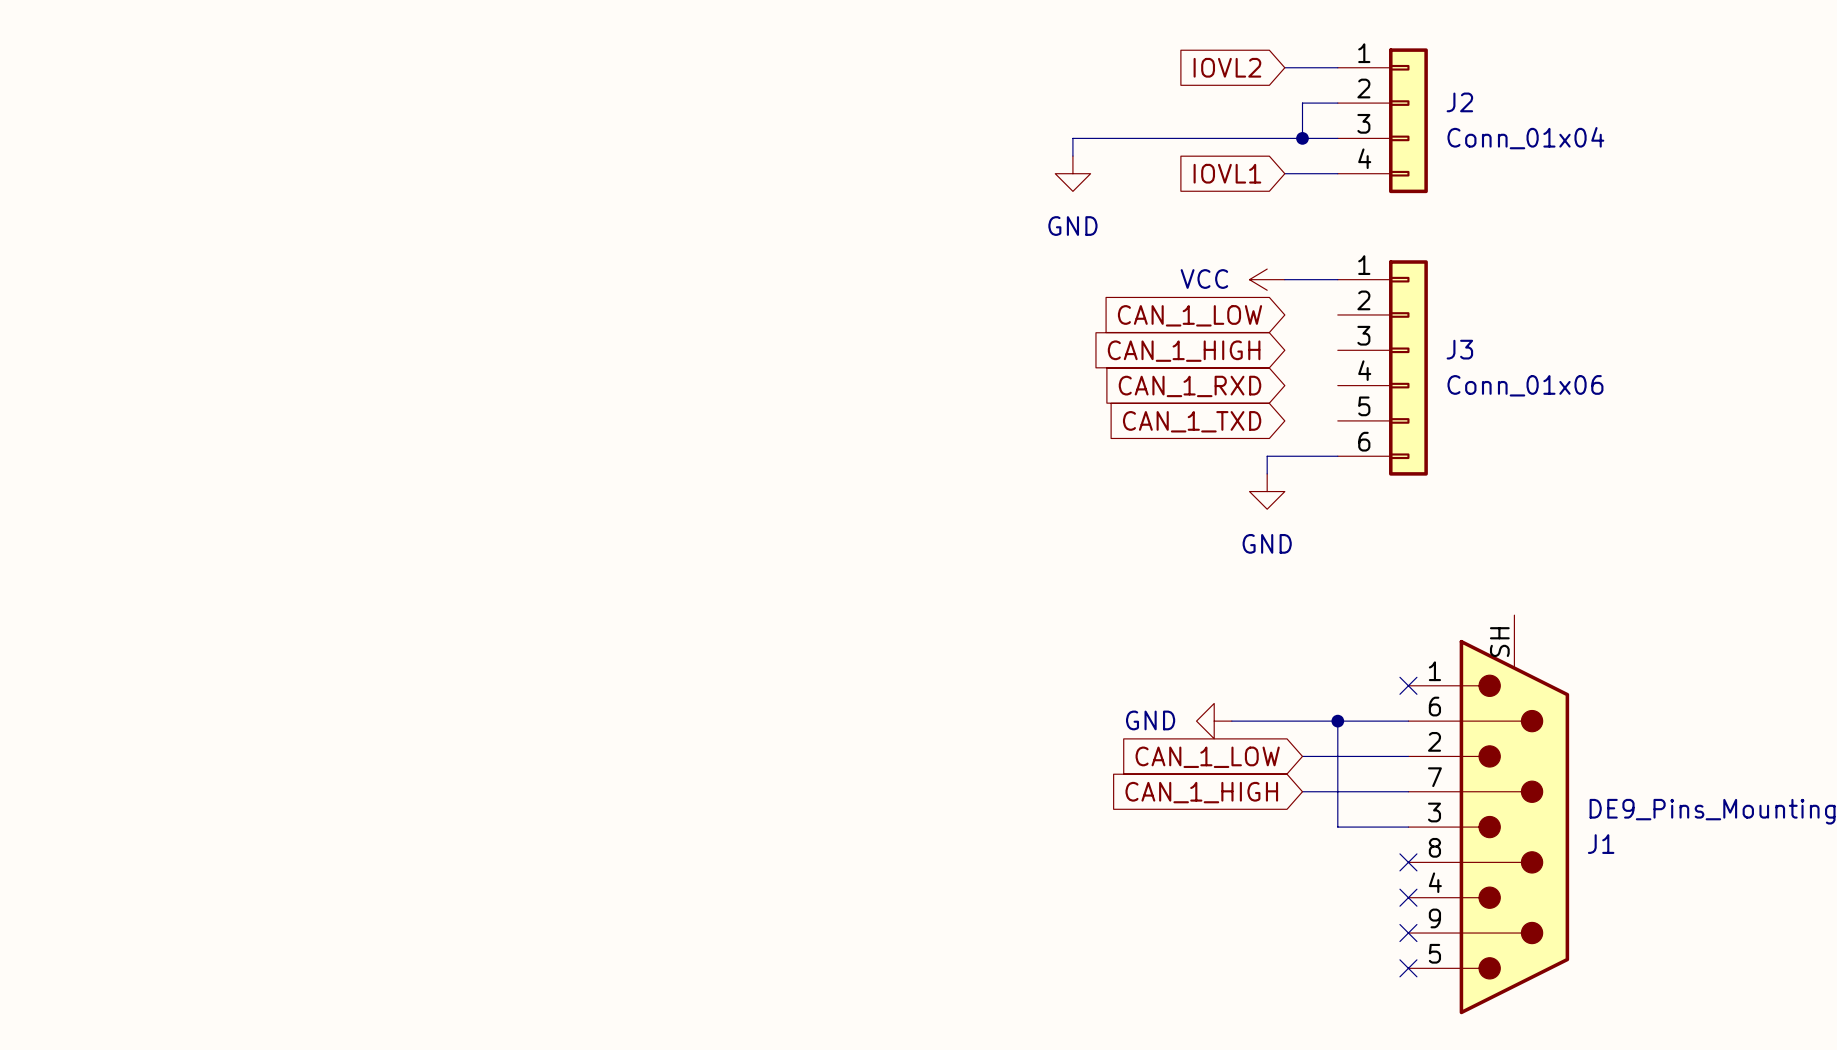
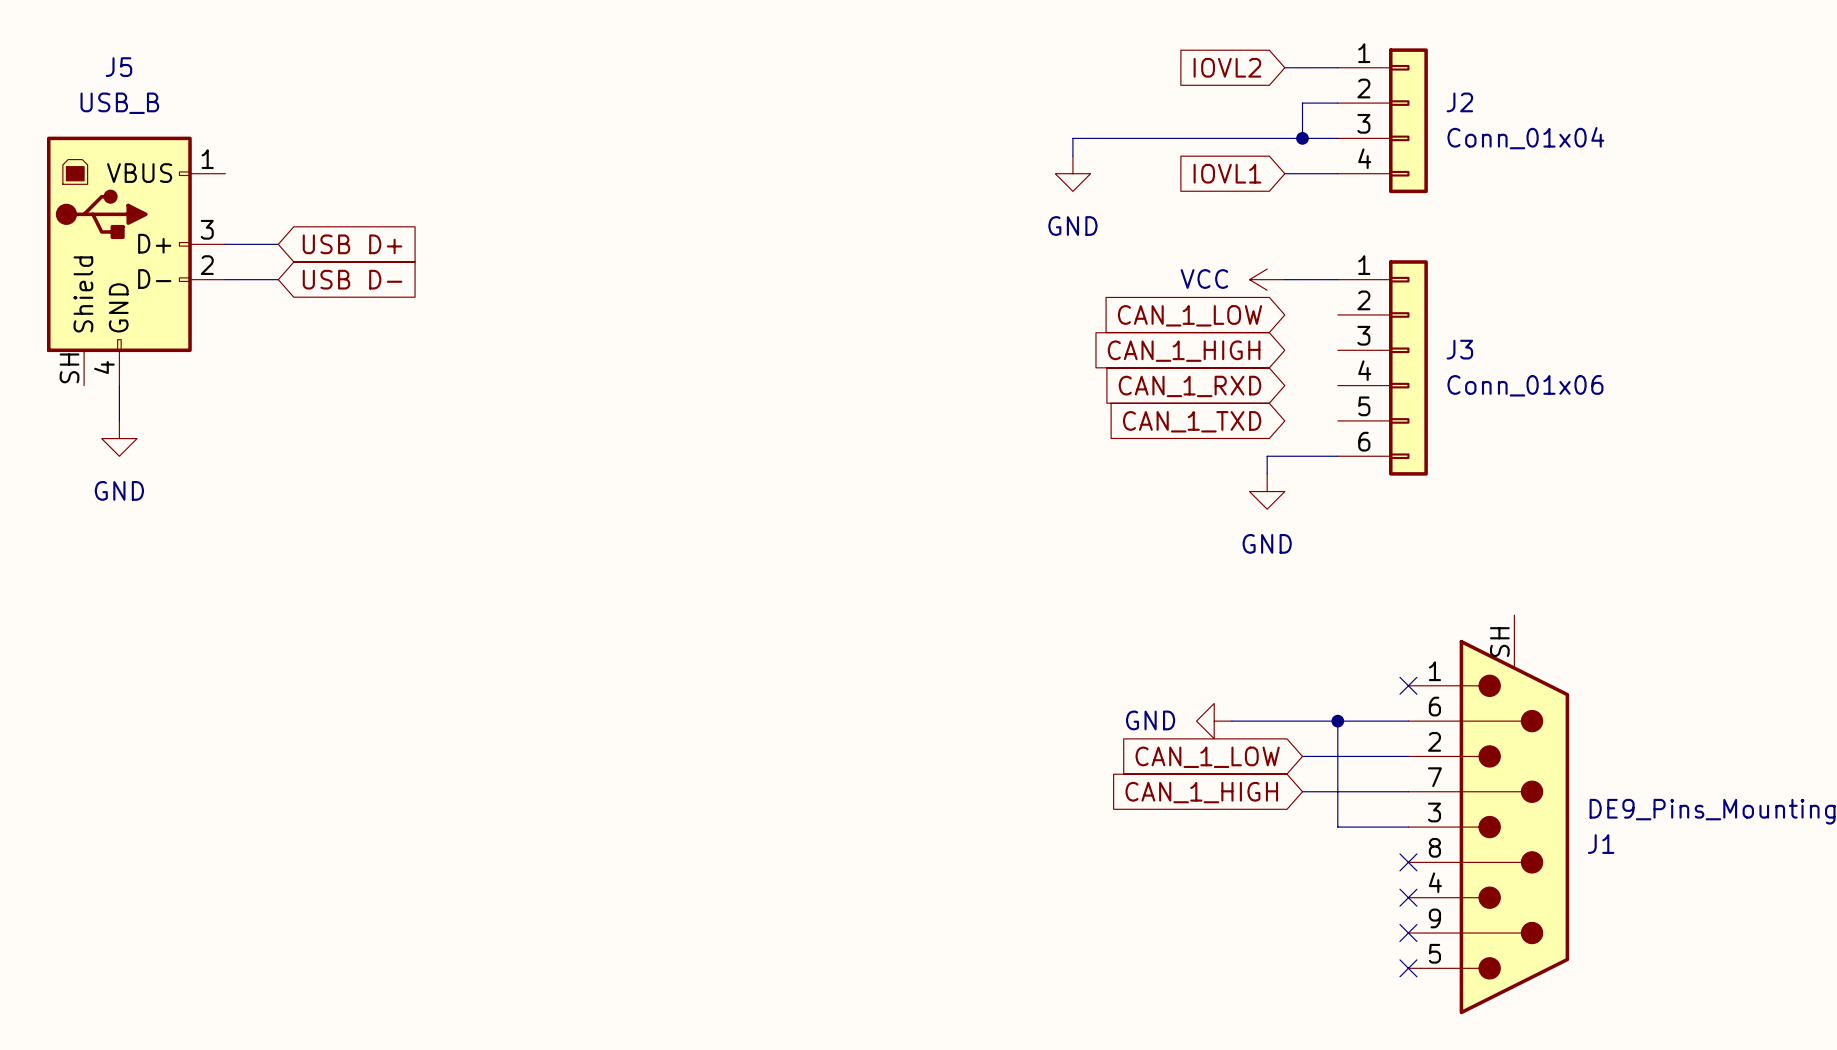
wire: none -> (225, 244) (278, 244)
global label: none -> USB D+ (352, 244)
J5: none -> USB_B (136, 261)
wire: none -> (225, 279) (278, 279)
global label: none -> USB D- (352, 279)
wire: none -> (119, 385) (119, 420)
power symbol: none -> GND (119, 438)

